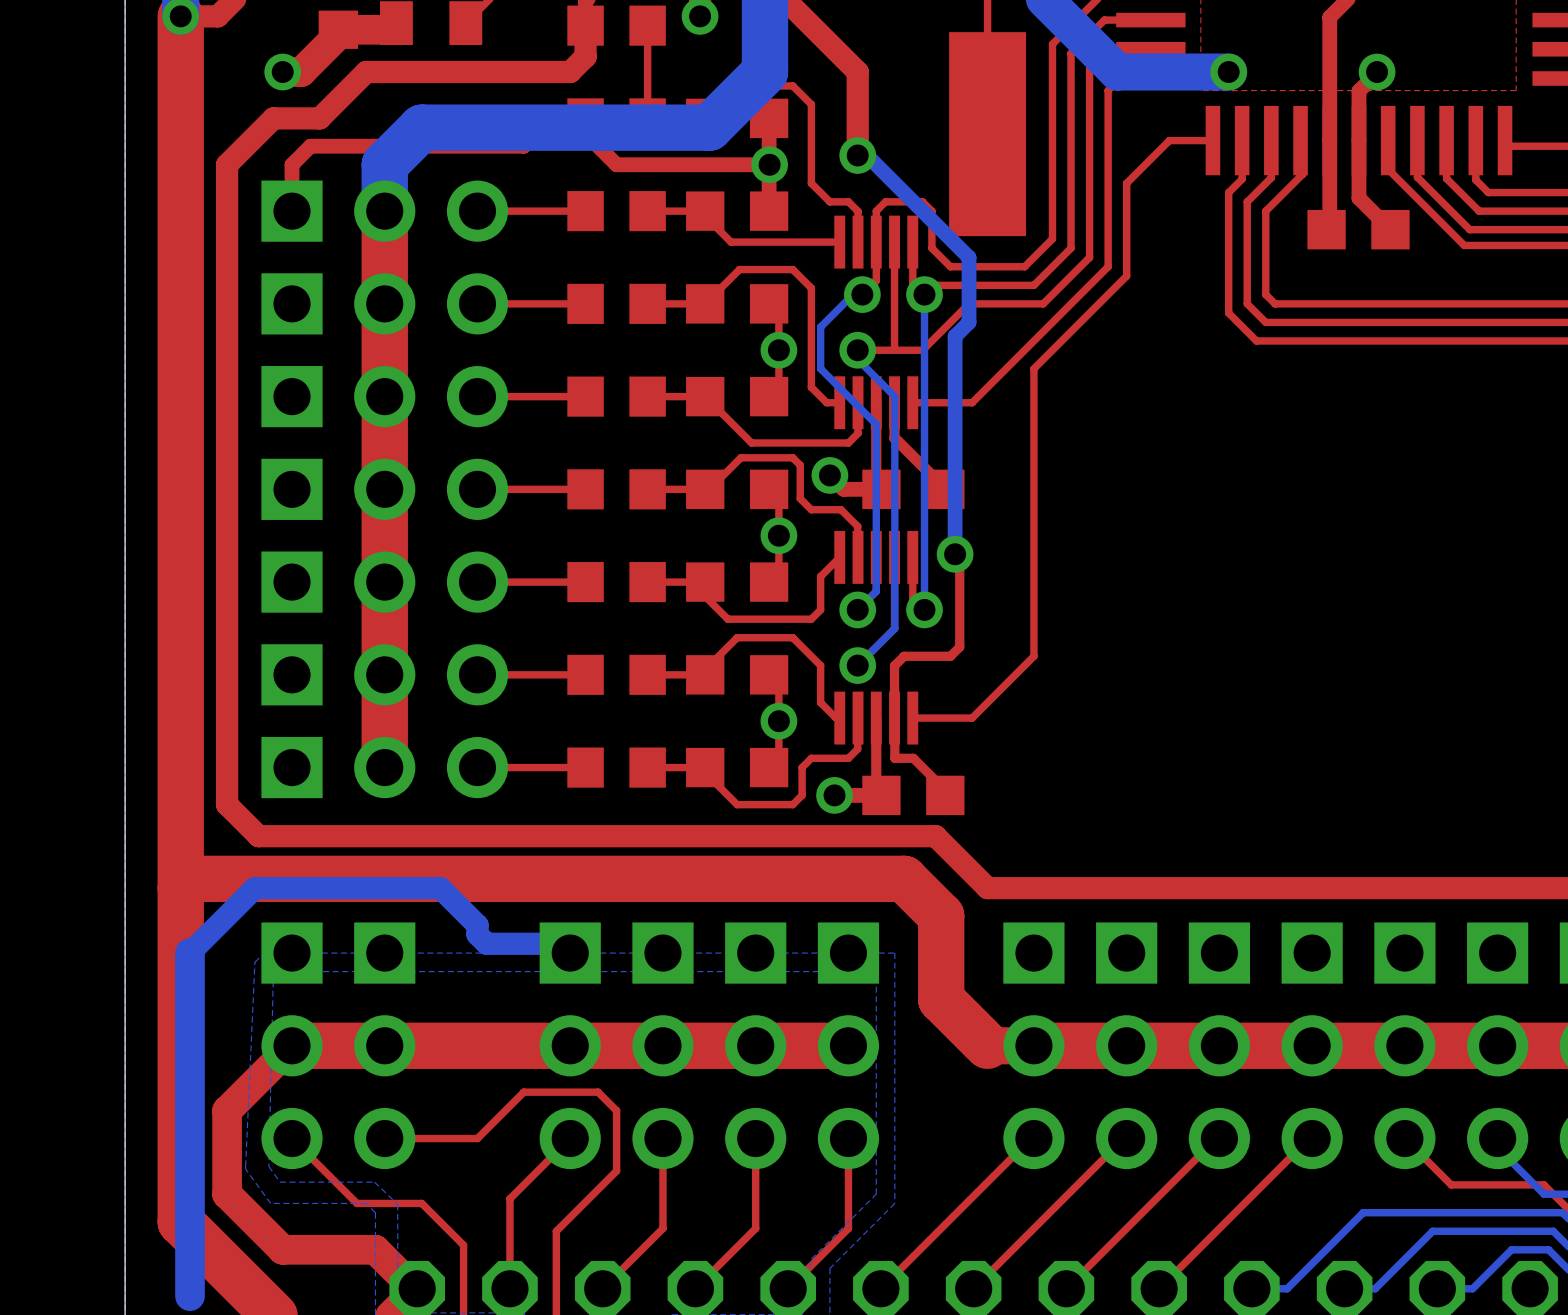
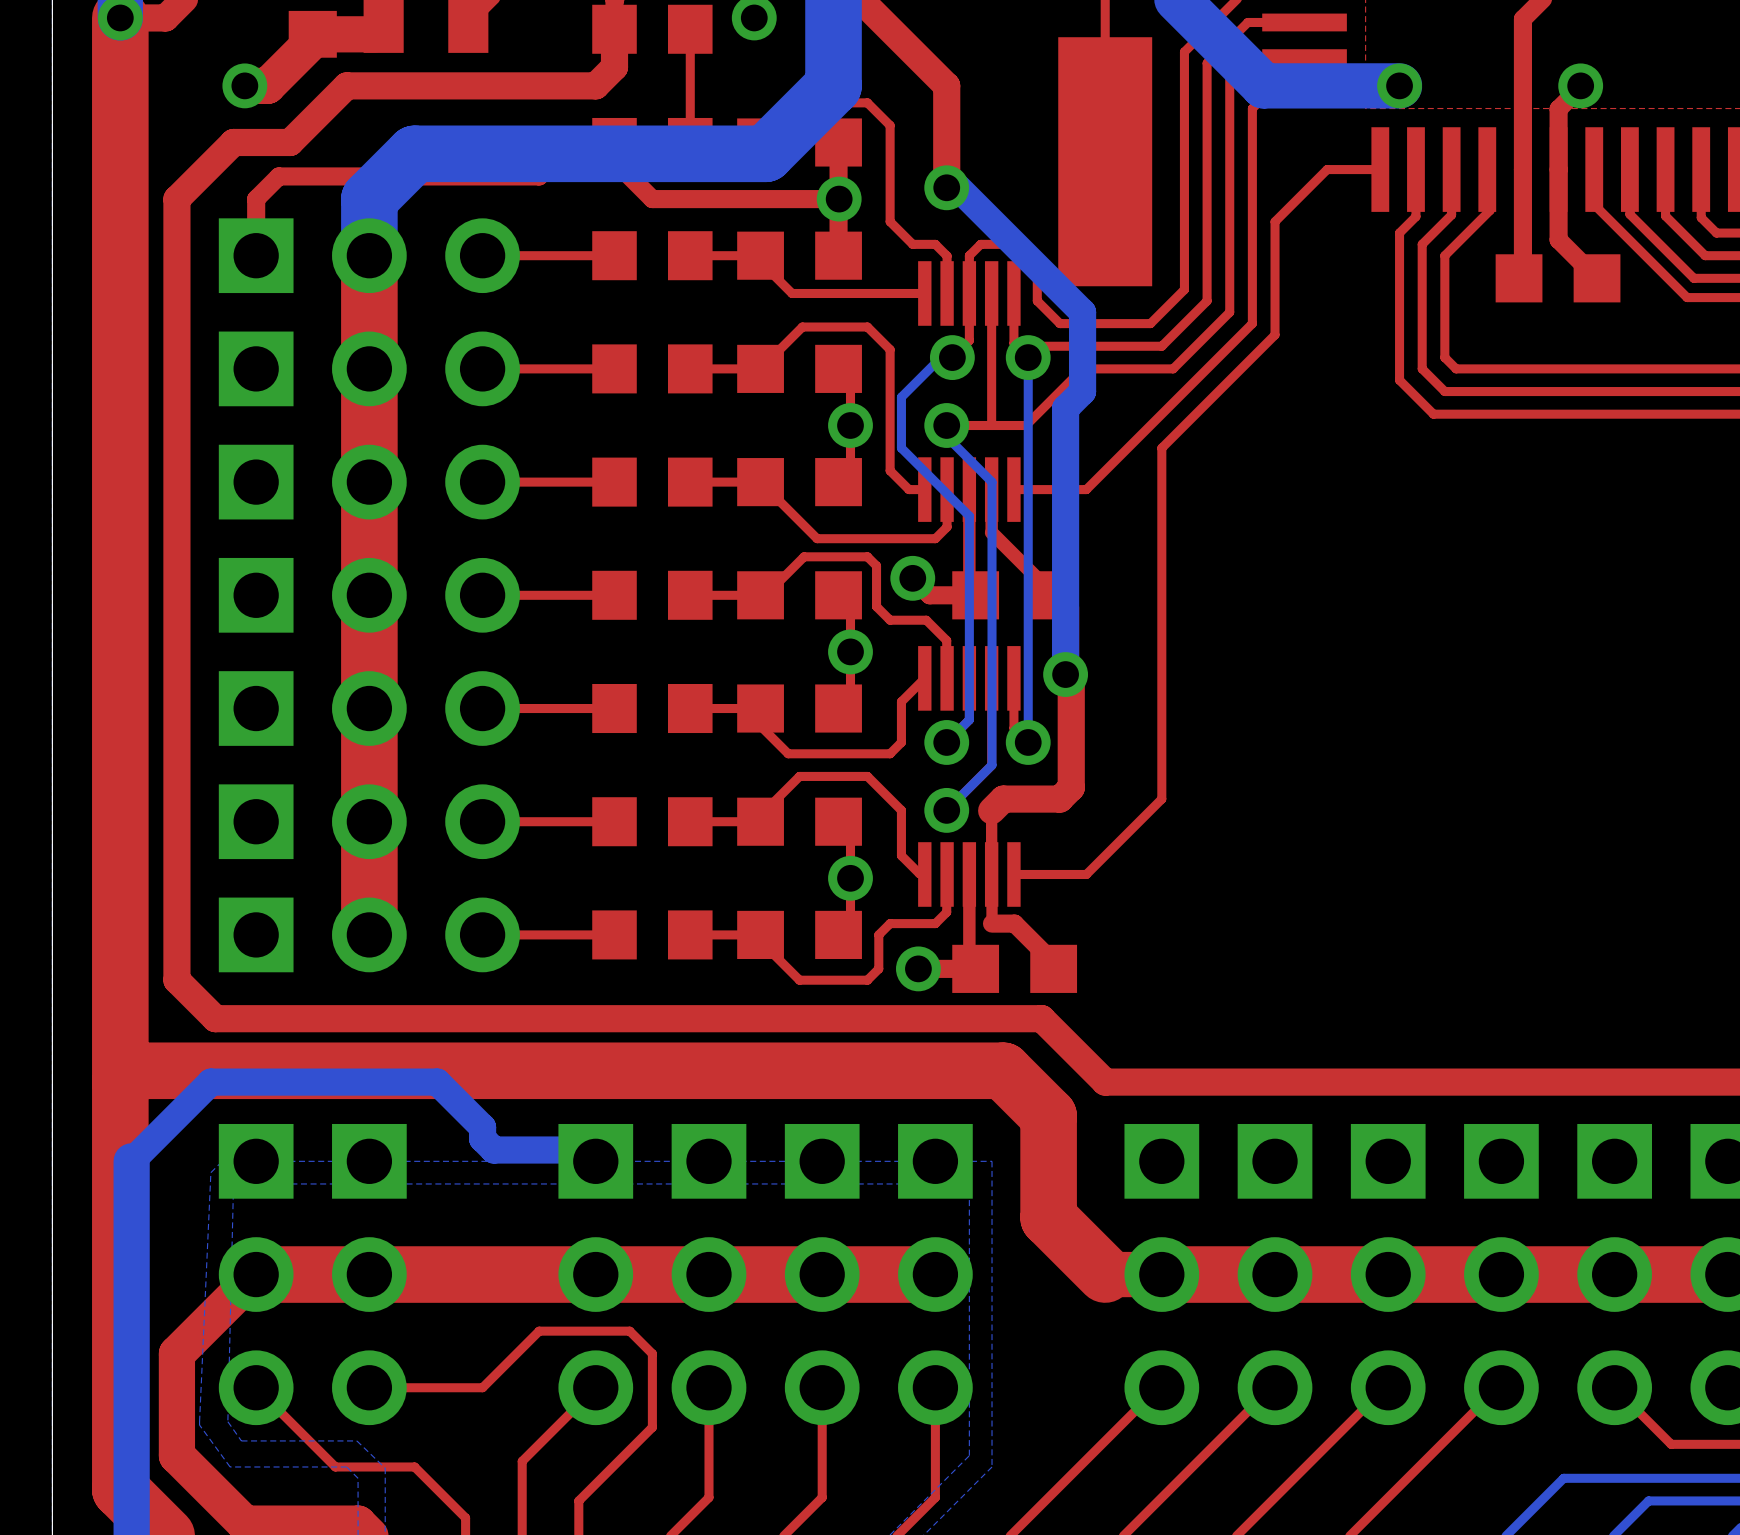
bottom track width: thin (867, 155) (969, 257) (969, 322) (955, 336) (955, 554) -> thick (958, 187) (1082, 312) (1082, 391) (1065, 408) (1065, 674)
top track width: thin (959, 558) (959, 647) (950, 656) (904, 656) (894, 665) -> thick (1071, 680) (1071, 787) (1059, 799) (1003, 799) (991, 810)
top track width: thin (894, 758) (913, 758) (945, 790) -> thick (992, 923) (1014, 923) (1053, 962)

